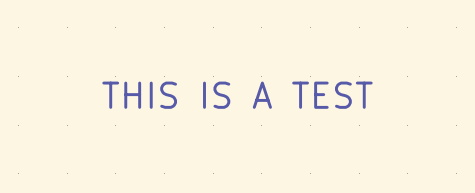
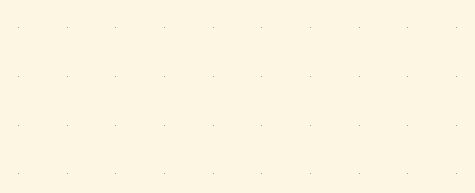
text: THIS IS A TEST (237, 95) -> none

